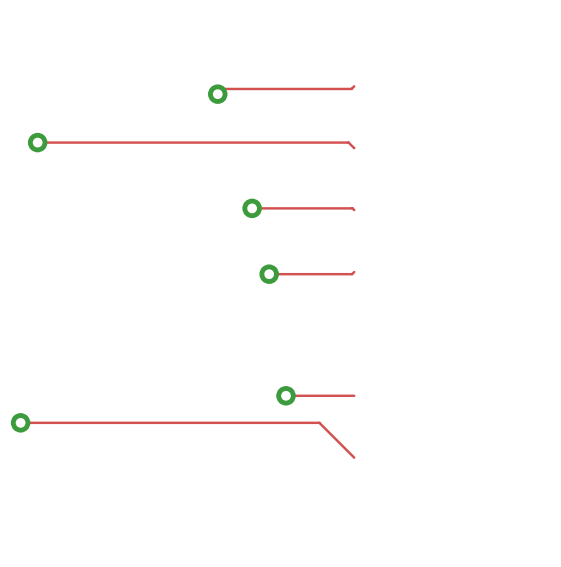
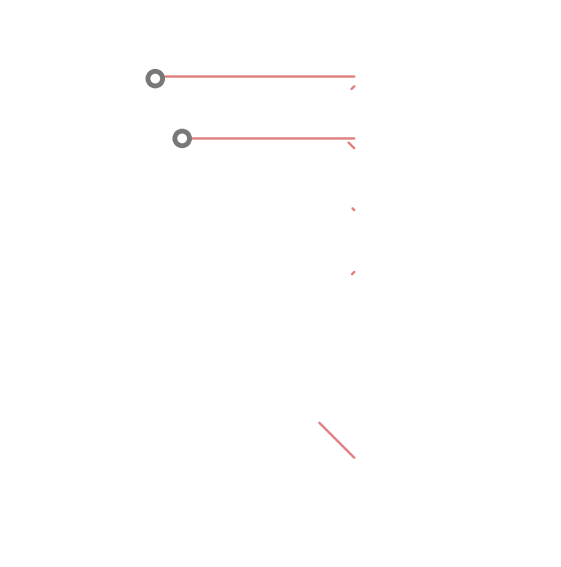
track: none -> (354, 76) (157, 76) (155, 78)
via: none -> (155, 78)
track: (351, 88) (222, 88) (217, 94) -> none
via: (217, 94) -> none
track: none -> (182, 138) (354, 138)
via: none -> (182, 138)
track: (37, 142) (348, 142) -> none
via: (37, 142) -> none
track: (252, 208) (352, 208) -> none
via: (252, 208) -> none
track: (269, 274) (352, 274) -> none
via: (269, 274) -> none
track: (285, 395) (354, 395) -> none
via: (285, 395) -> none
track: (20, 422) (319, 422) -> none
via: (20, 422) -> none

